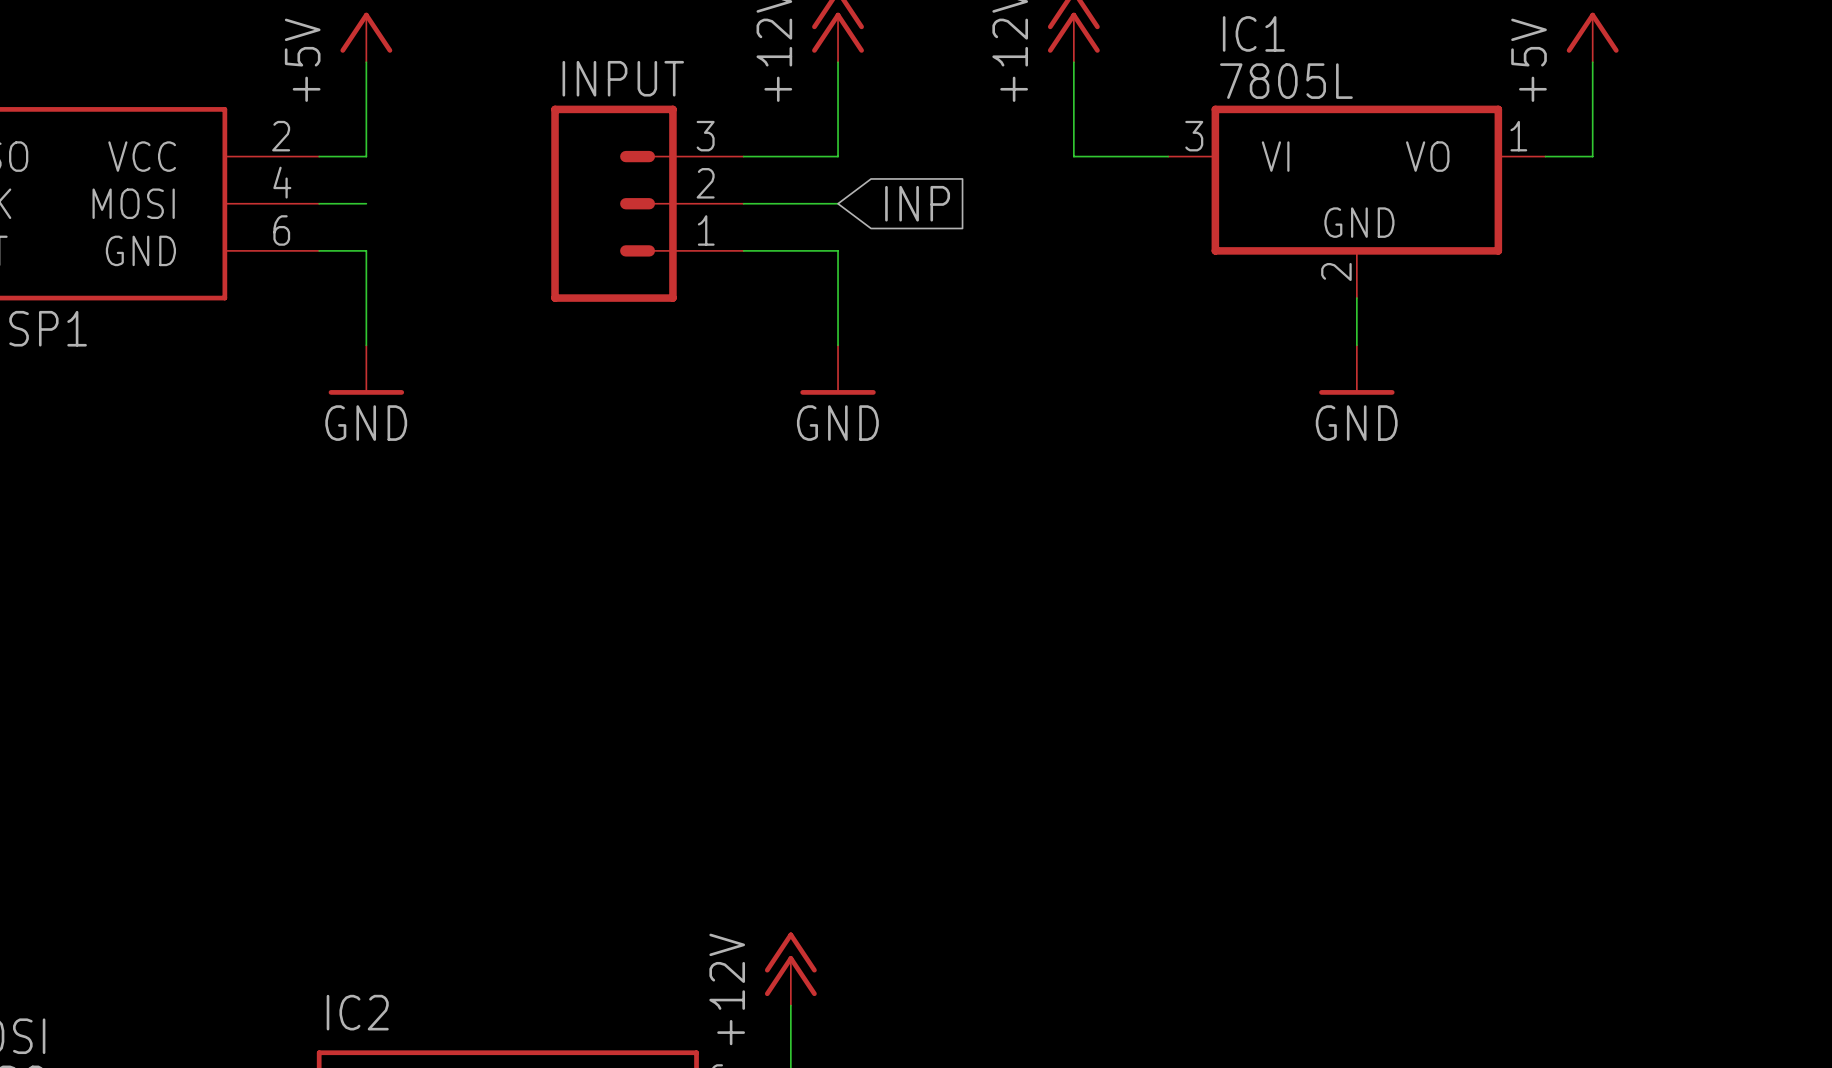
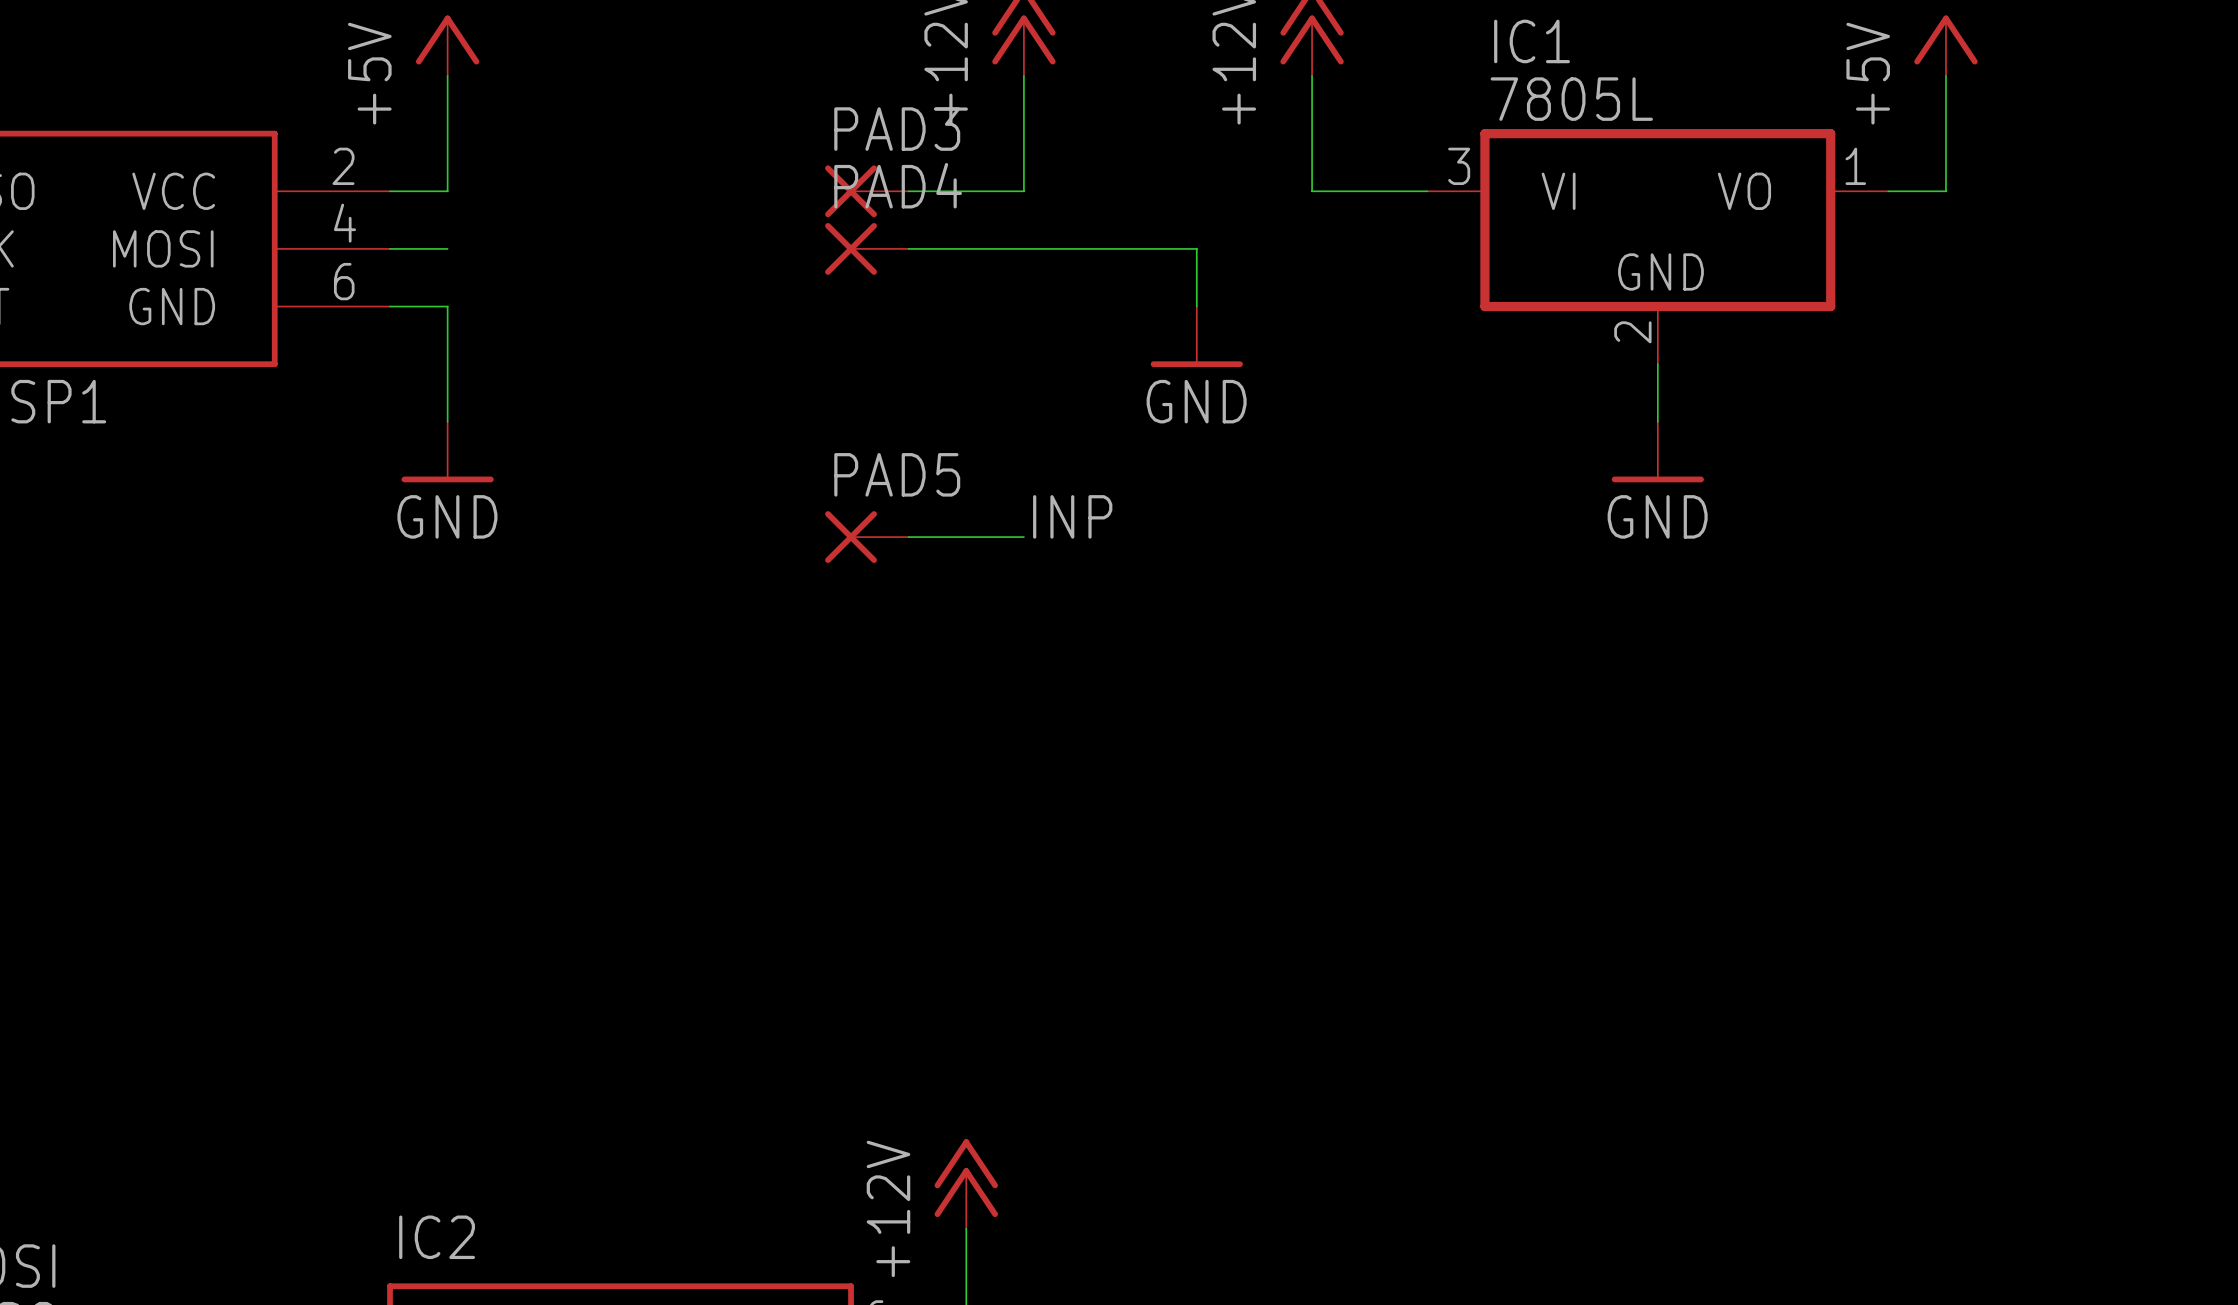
PAD3: none -> (866, 191)
INPUT: (647, 203) -> none
PAD4: none -> (866, 248)
wire: none -> (1023, 248) (1196, 248) (1196, 306)
global label: INP (917, 203) -> none
wire: (743, 250) (838, 250) (838, 345) -> none
power symbol position: GND (838, 369) -> GND (1196, 336)
label: none -> INP (1072, 516)
PAD5: none -> (866, 537)
wire: none -> (908, 537) (1023, 537)

